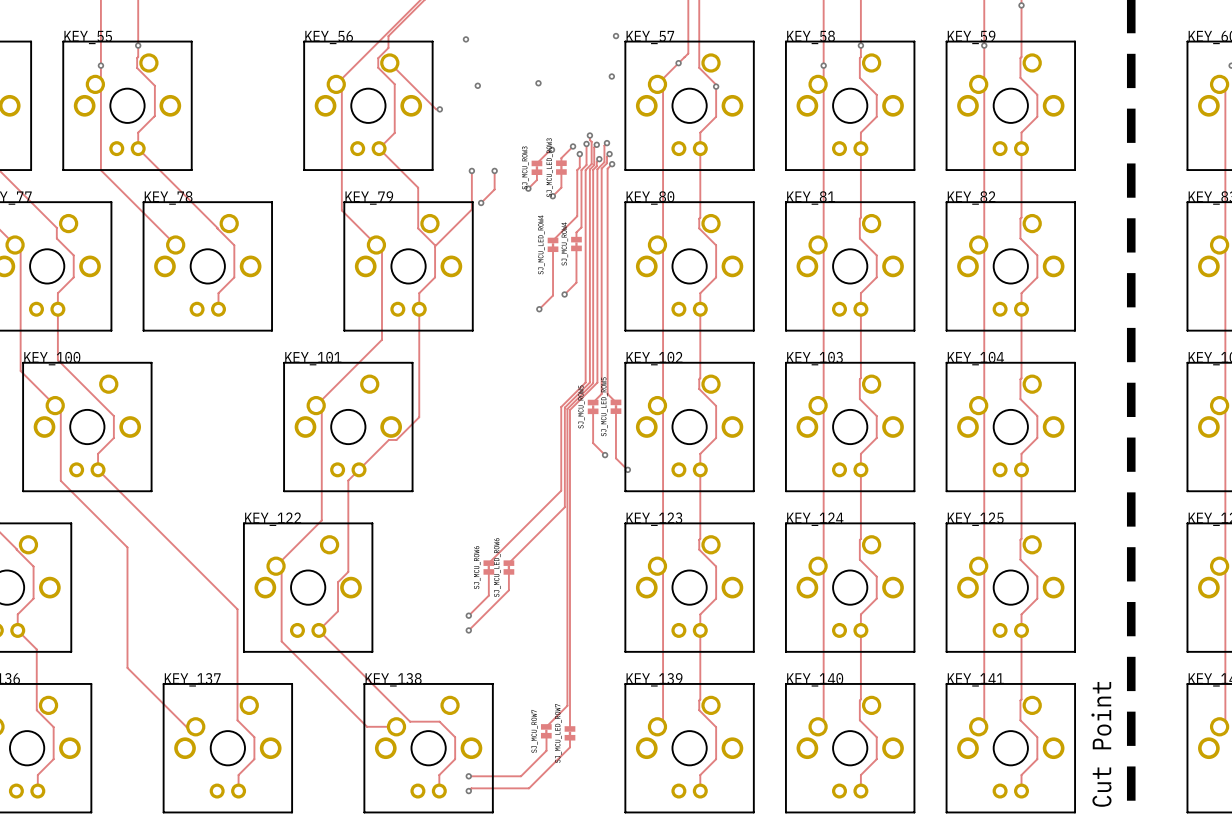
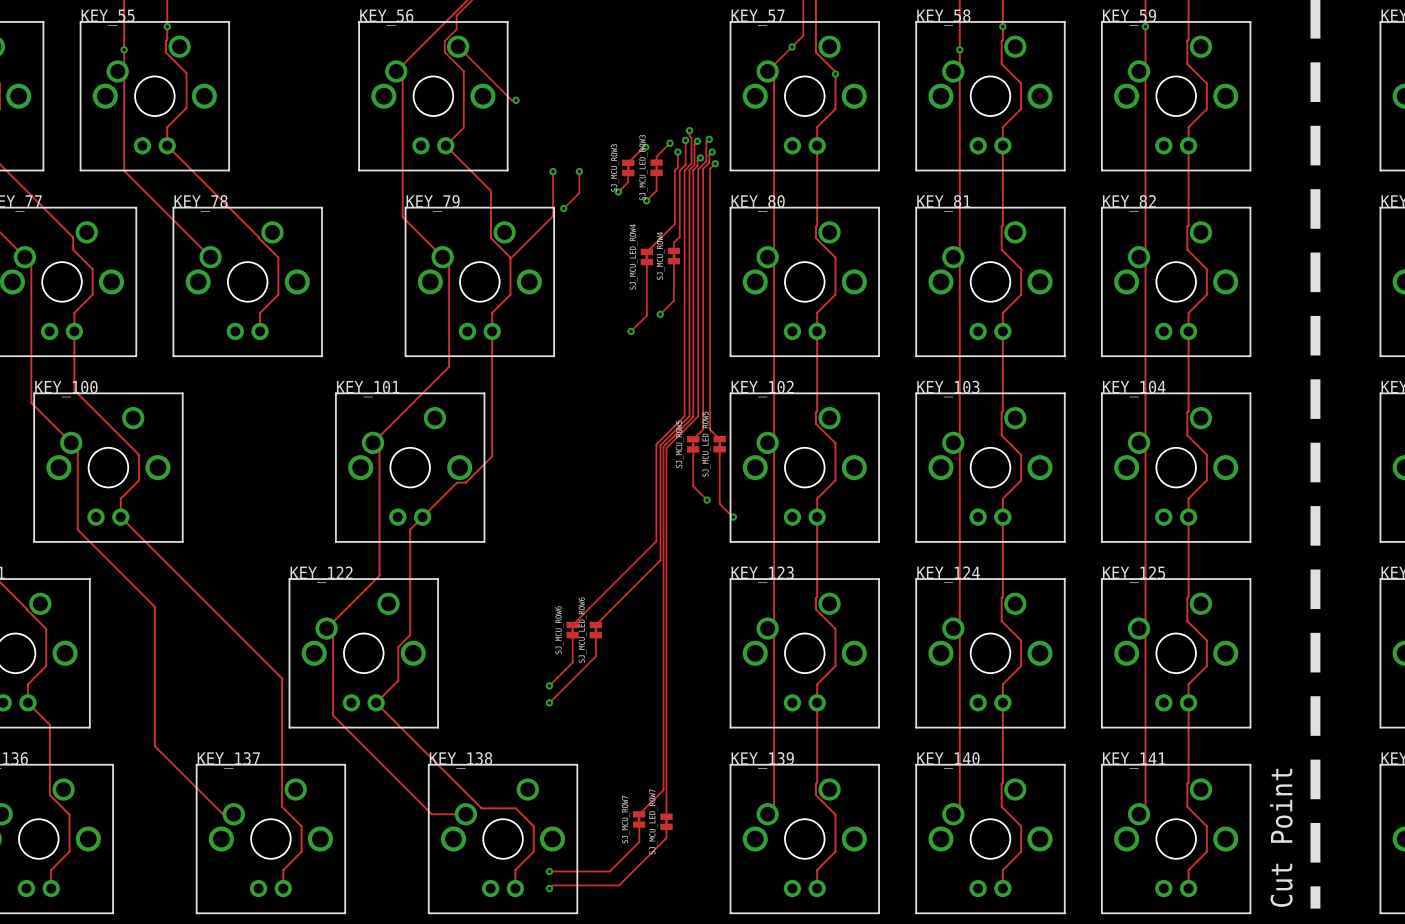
via: (616, 36) -> none
via: (465, 39) -> none
via: (611, 76) -> none
via: (538, 83) -> none
via: (477, 85) -> none

